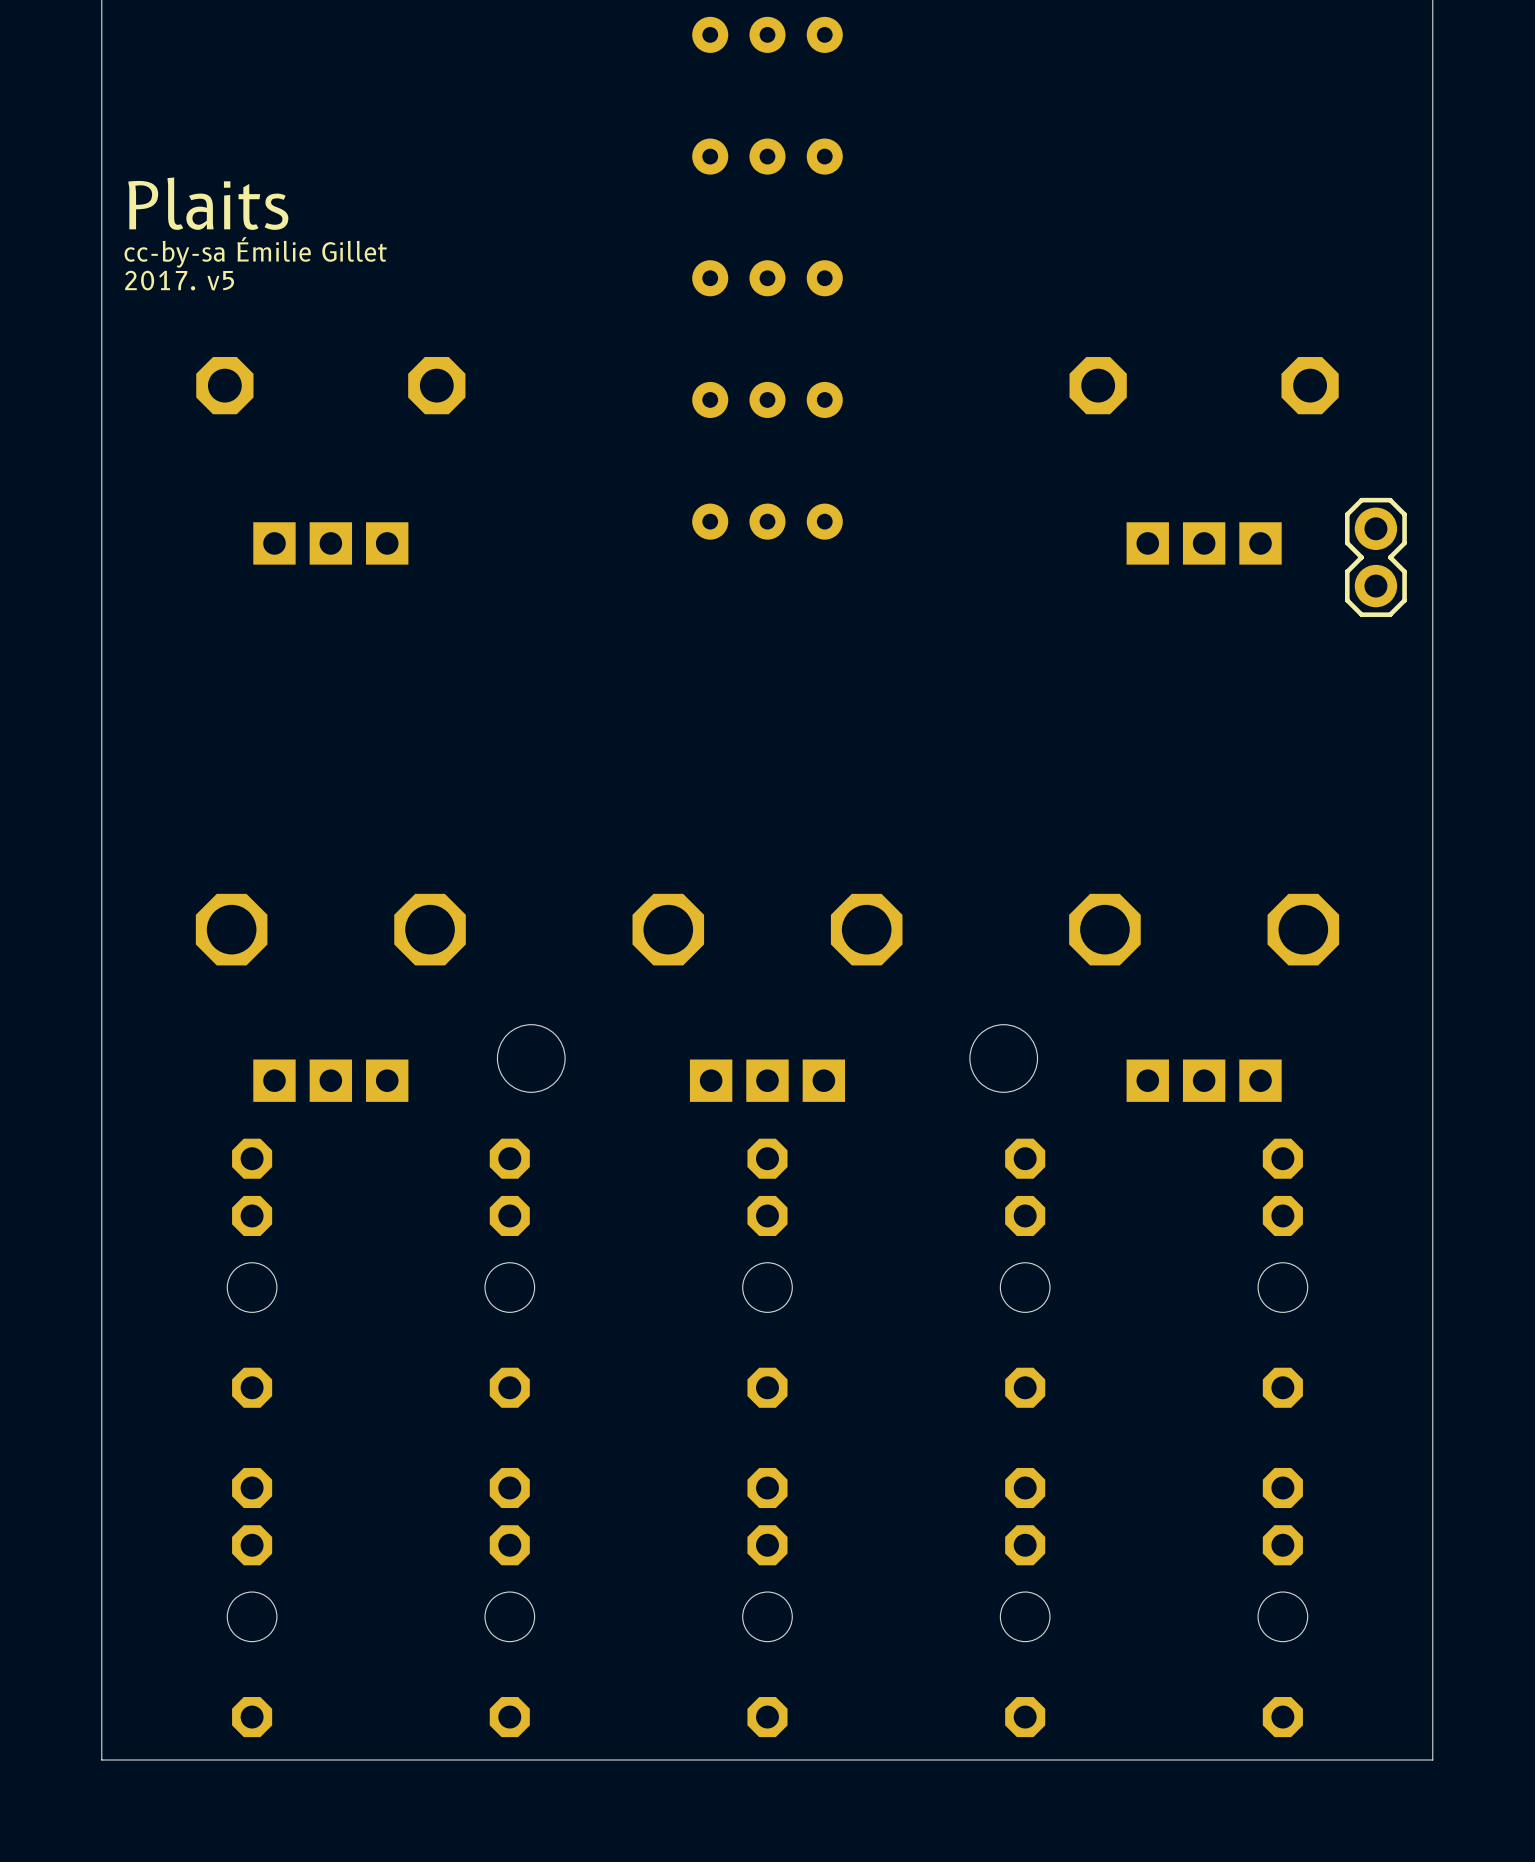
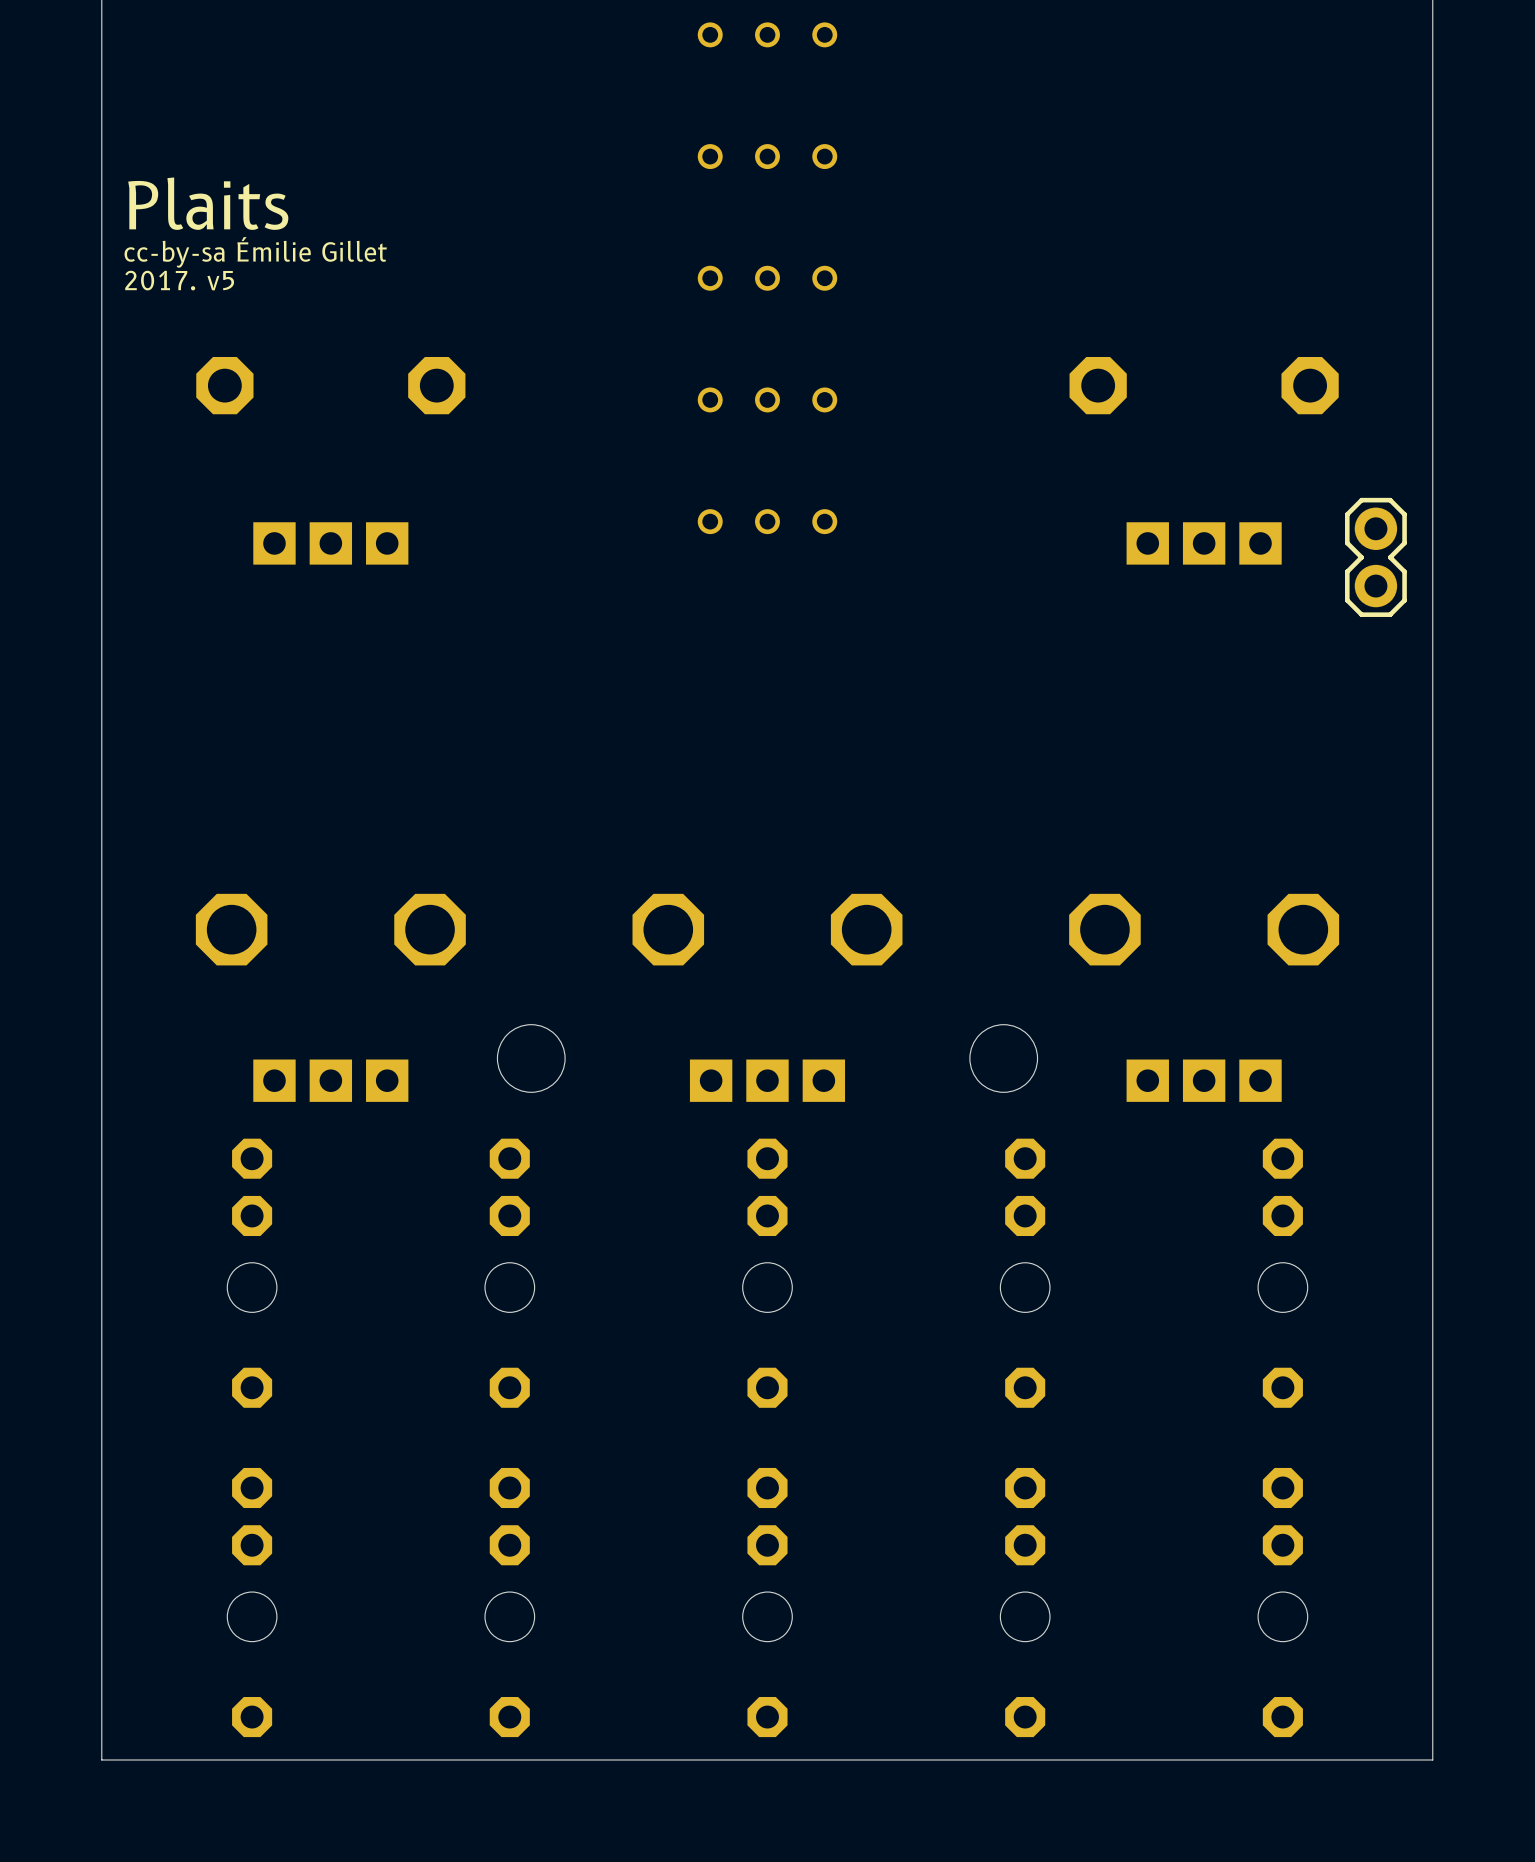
part footprint: [692, 16, 843, 53] -> [697, 22, 838, 48]
part footprint: [692, 138, 843, 175] -> [697, 144, 838, 170]
part footprint: [692, 260, 843, 297] -> [697, 265, 838, 291]
part footprint: [692, 381, 843, 418] -> [697, 387, 838, 413]
part footprint: [692, 503, 843, 540] -> [697, 509, 838, 535]

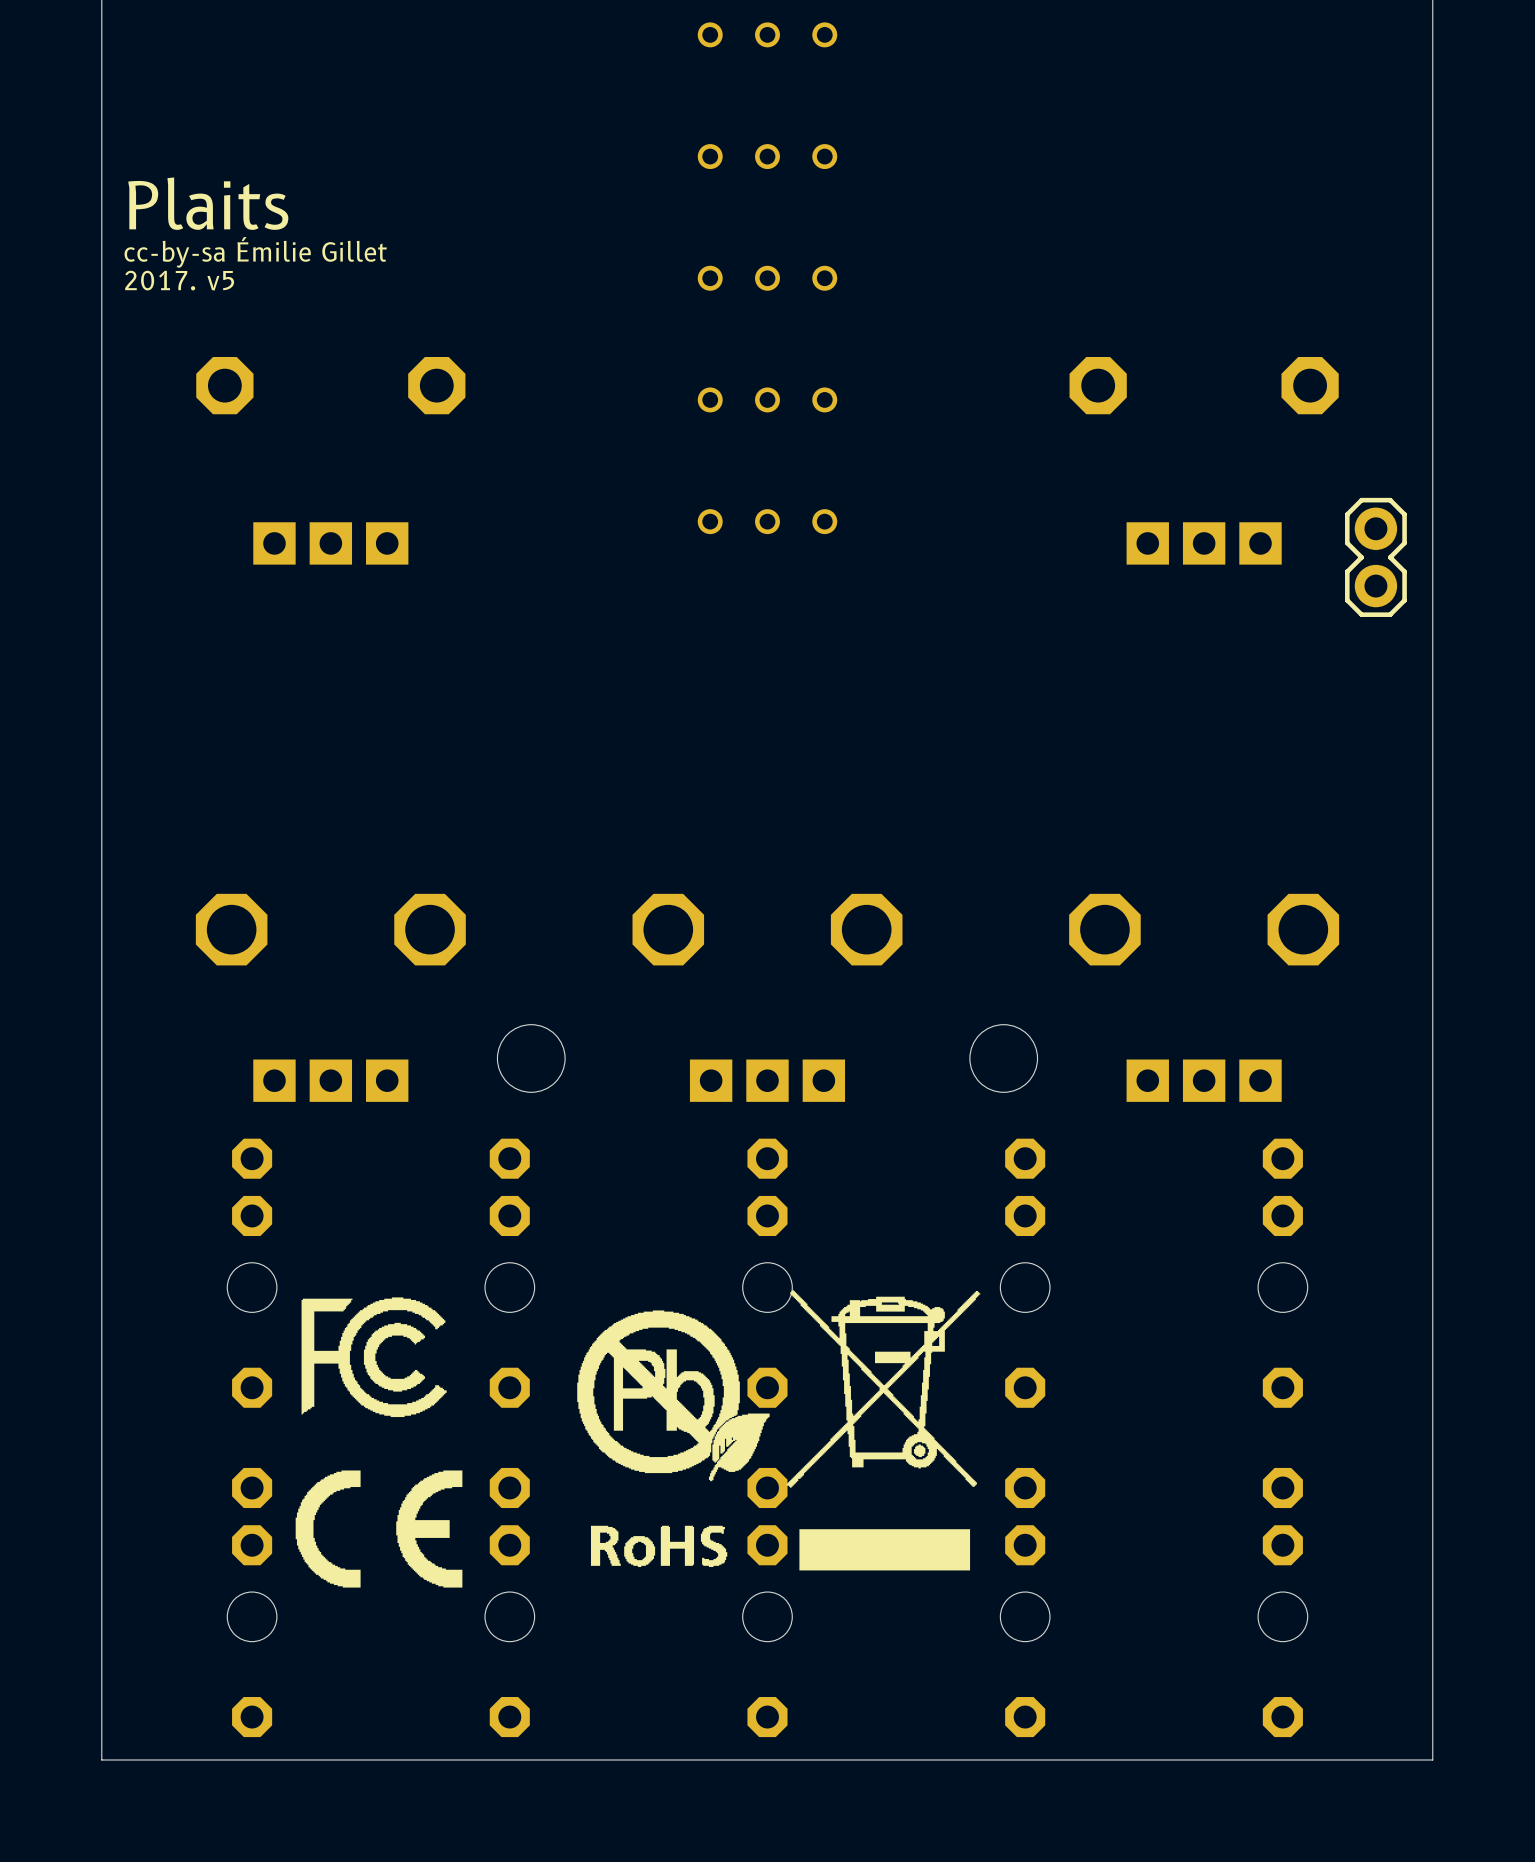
drawing: none -> [577, 1289, 981, 1571]
drawing: none -> [301, 1297, 447, 1418]
drawing: none -> [295, 1470, 463, 1588]

